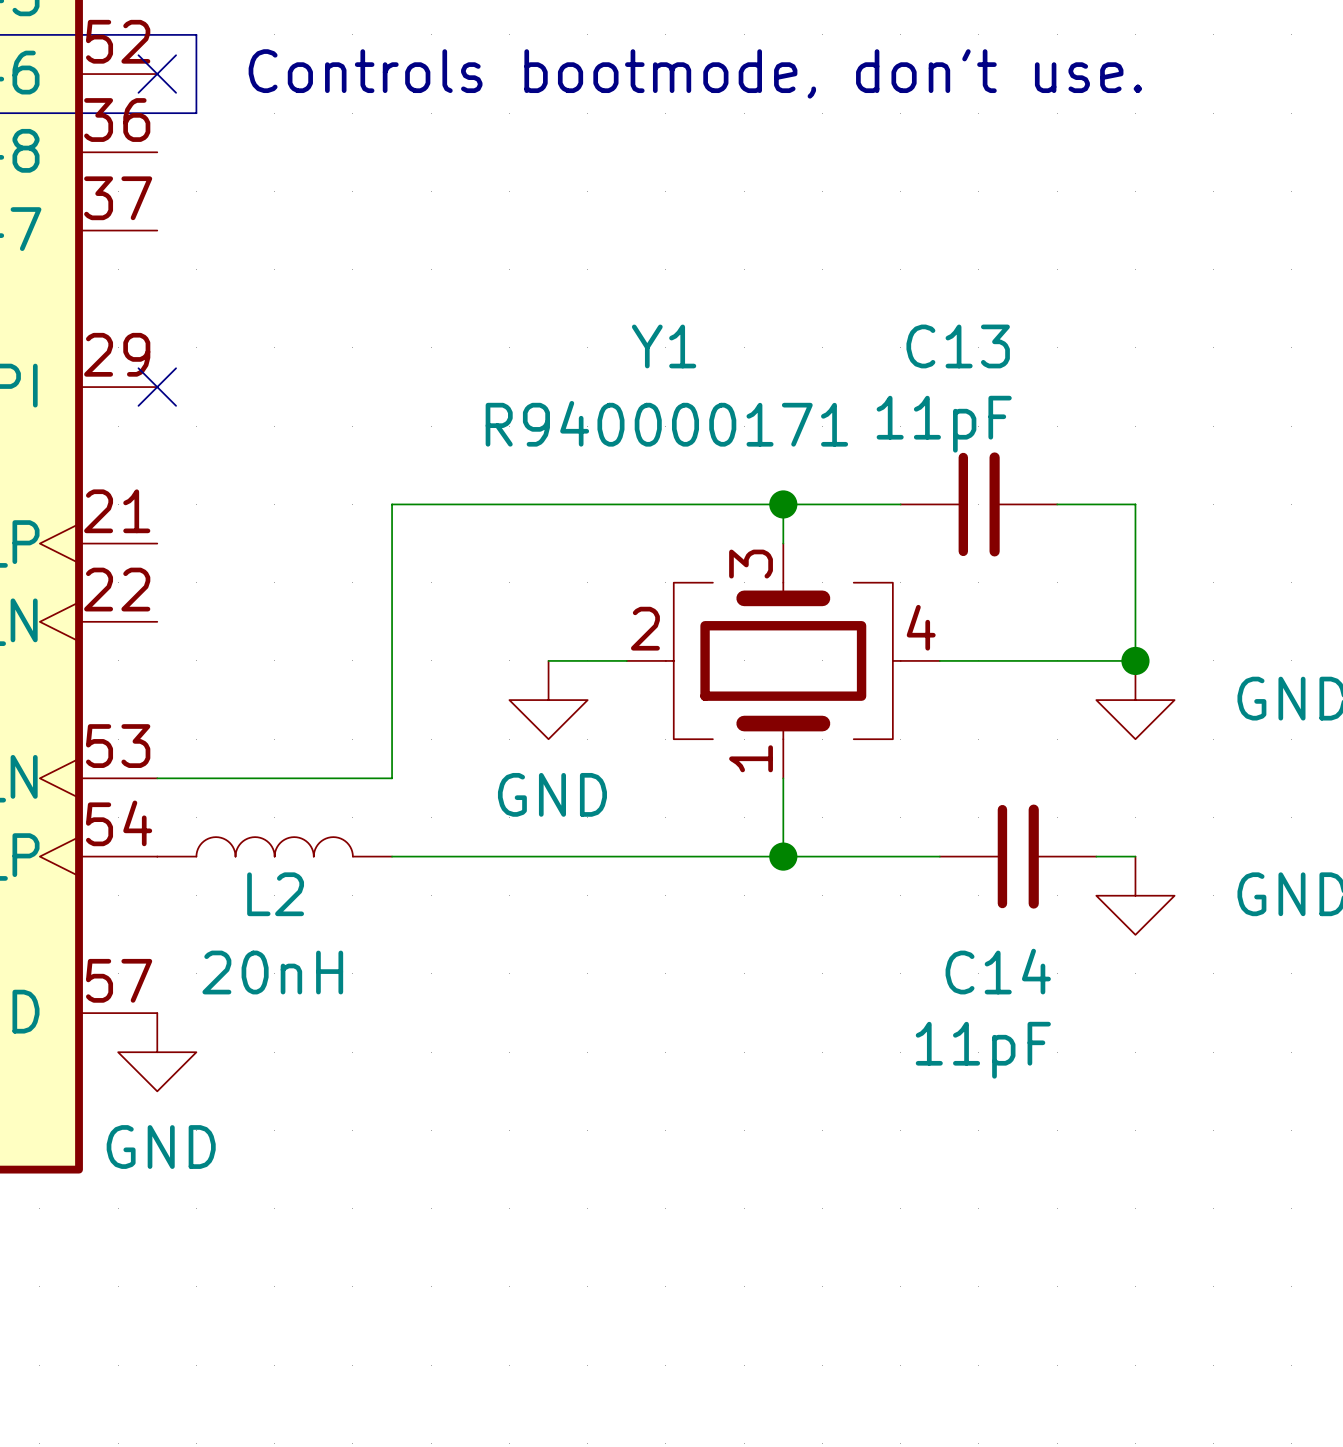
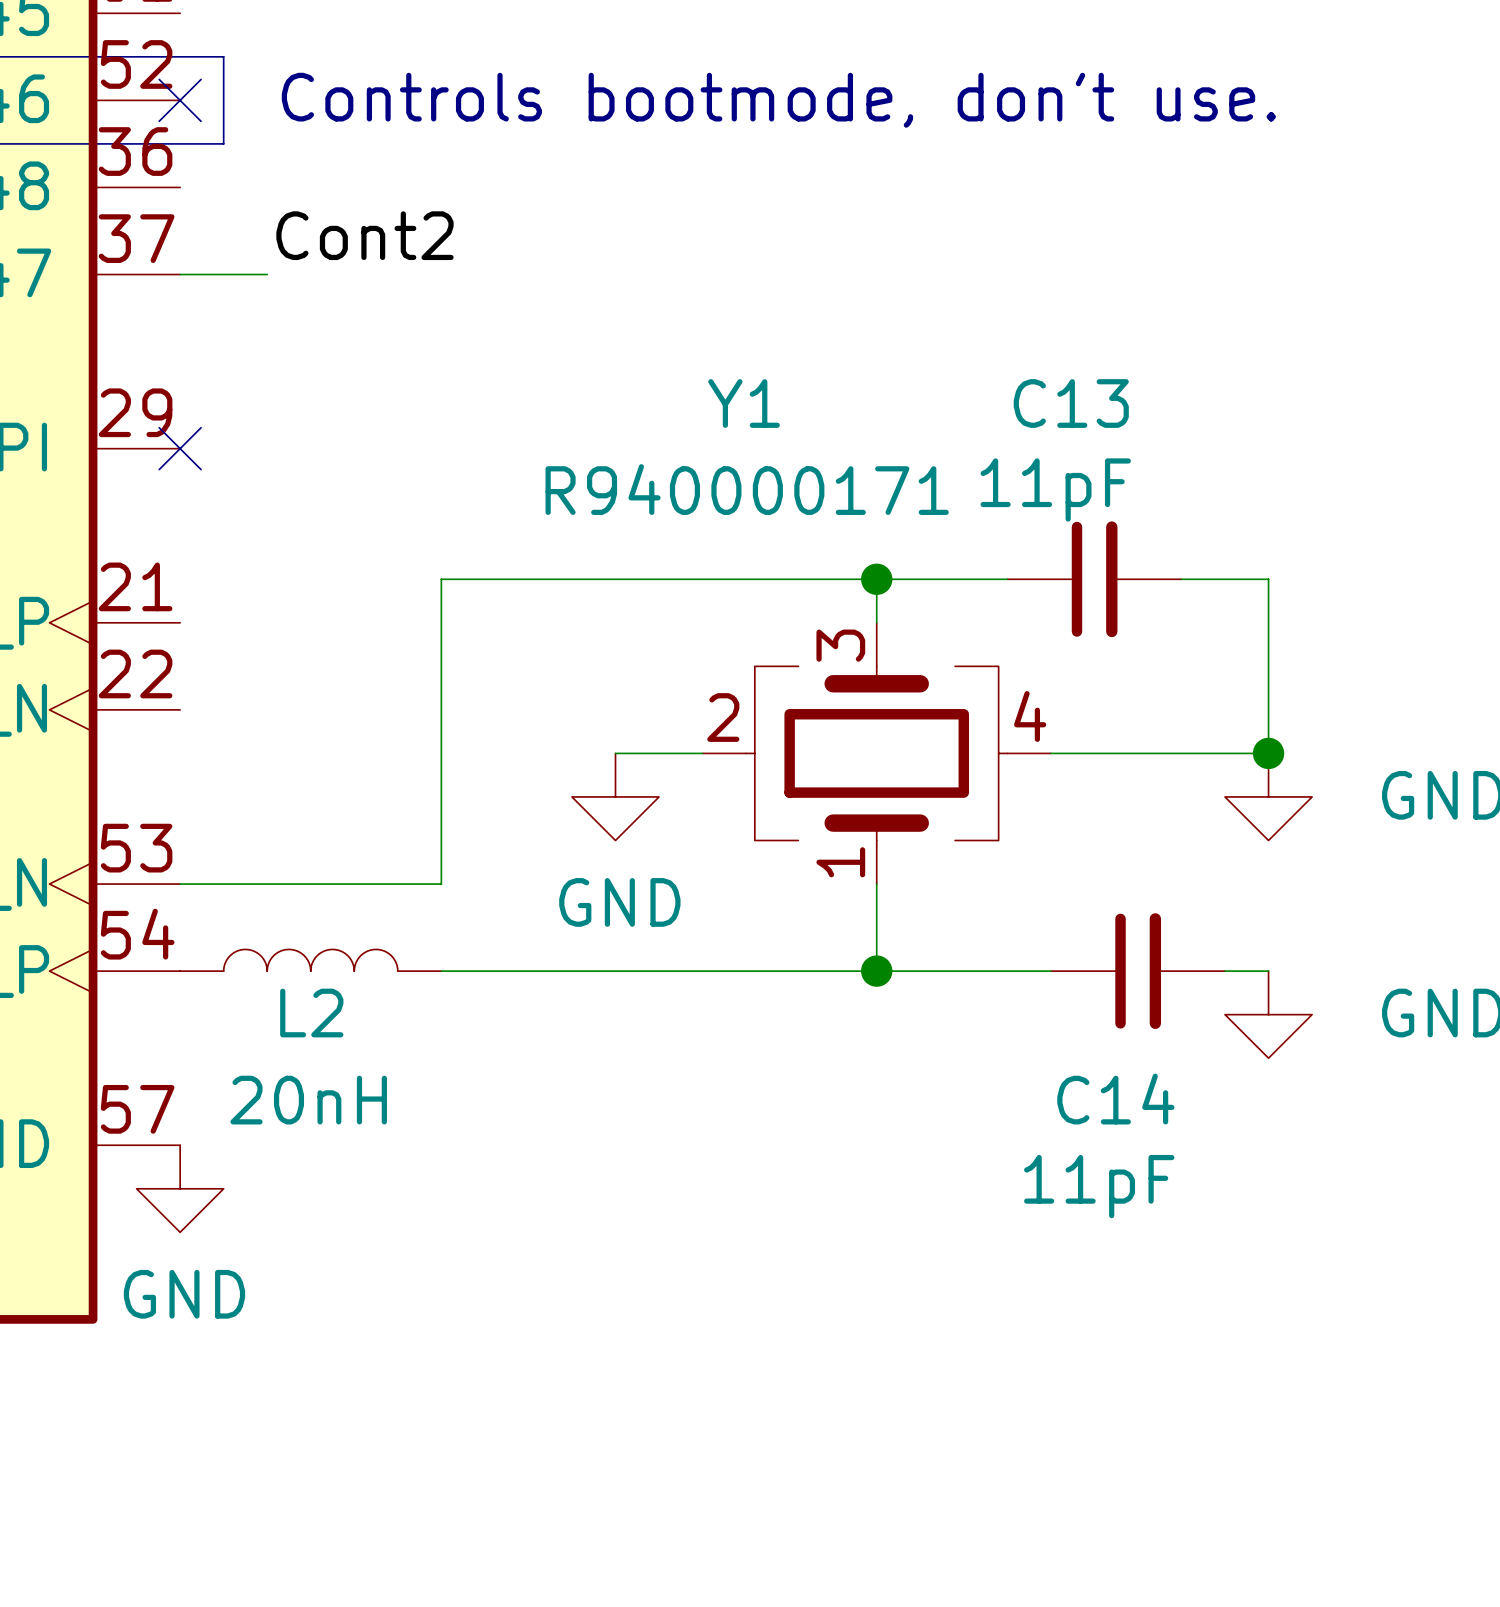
label: none -> Cont2 (364, 235)
wire: none -> (180, 274) (267, 274)

